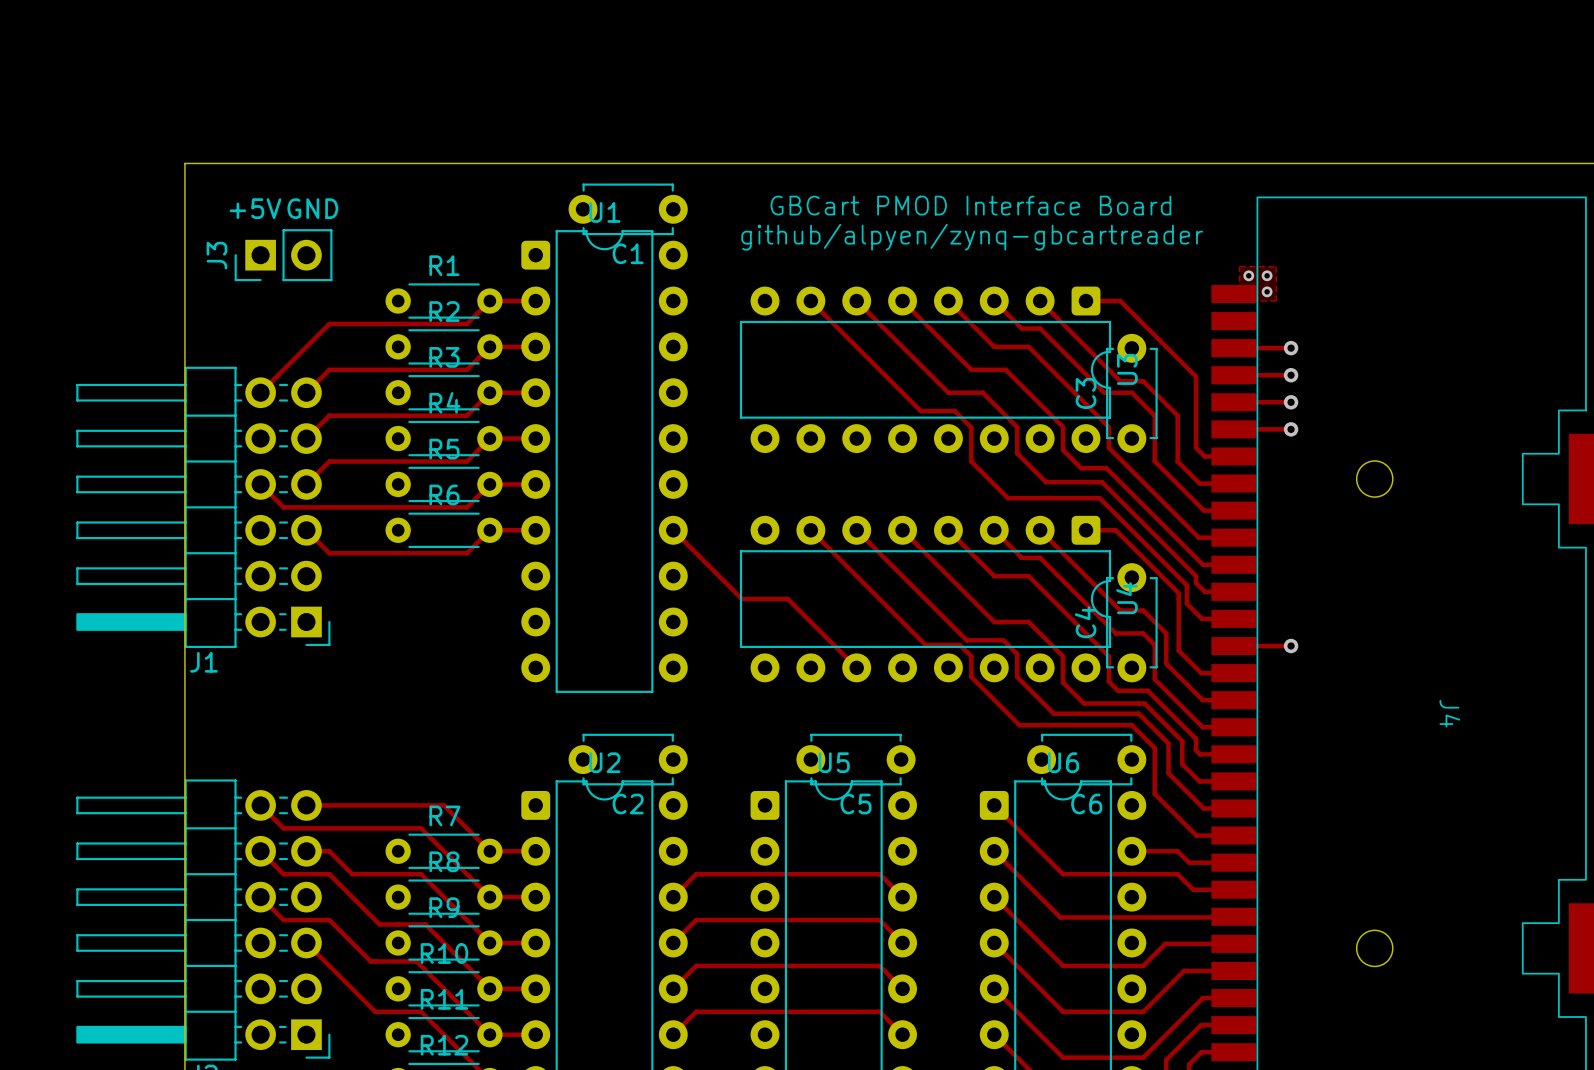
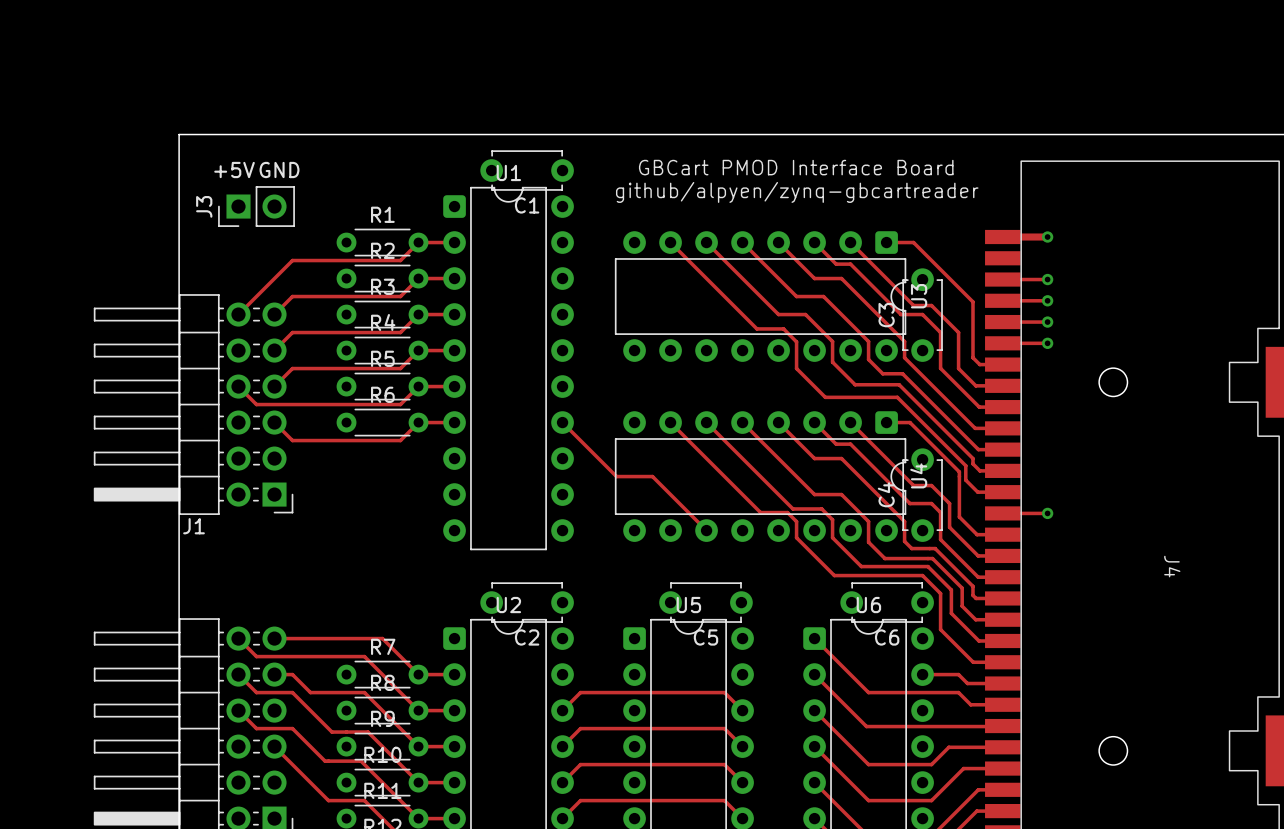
zone outline: (1239, 266) (1276, 266) (1276, 301) (1239, 301) (1239, 266) -> none
via: (1248, 275) -> none
via: (1267, 275) -> none
via: (1267, 291) -> none
track: none -> (1002, 237) (1047, 237)
via: none -> (1047, 237)

